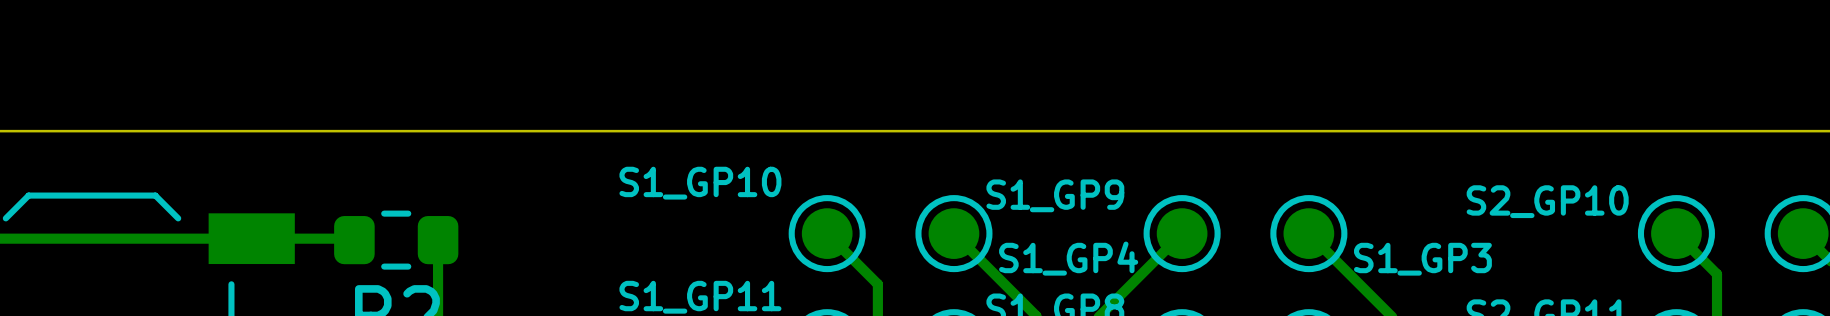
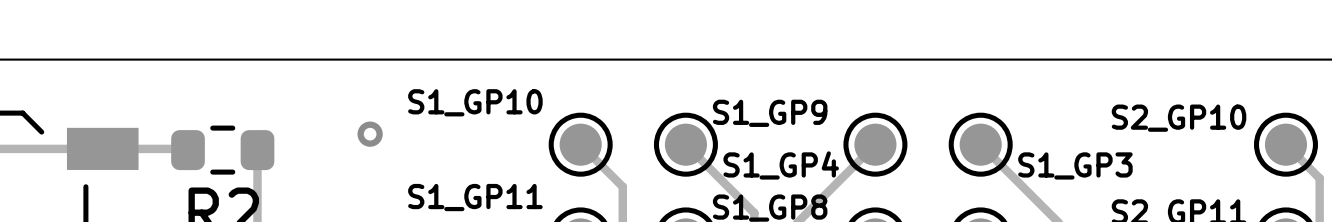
via: none -> (370, 134)

